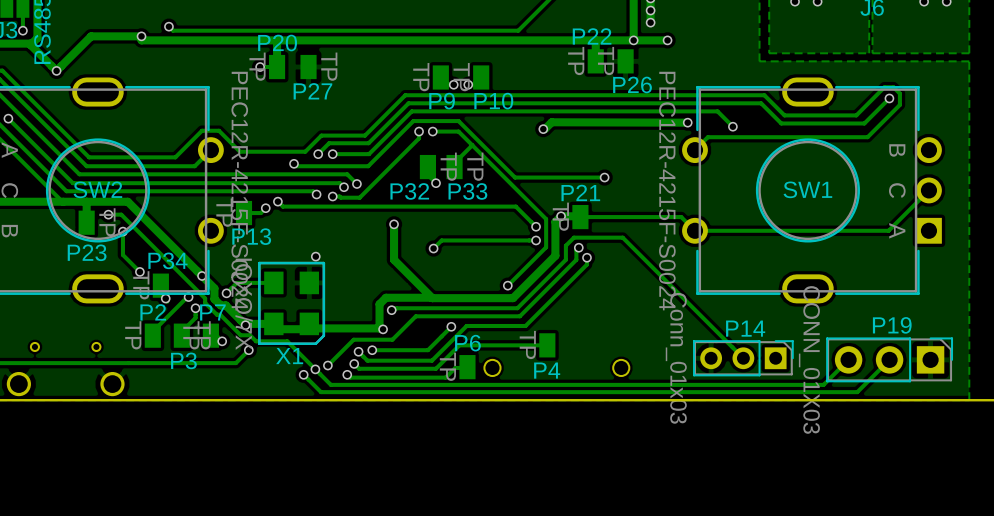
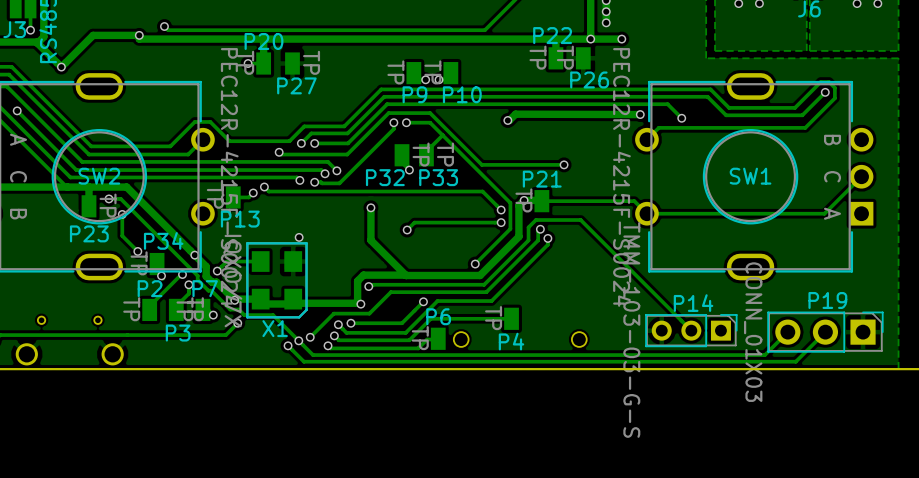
P14 value: Conn_01x03 (676, 358) -> TMM-103-03-G-S (631, 329)

